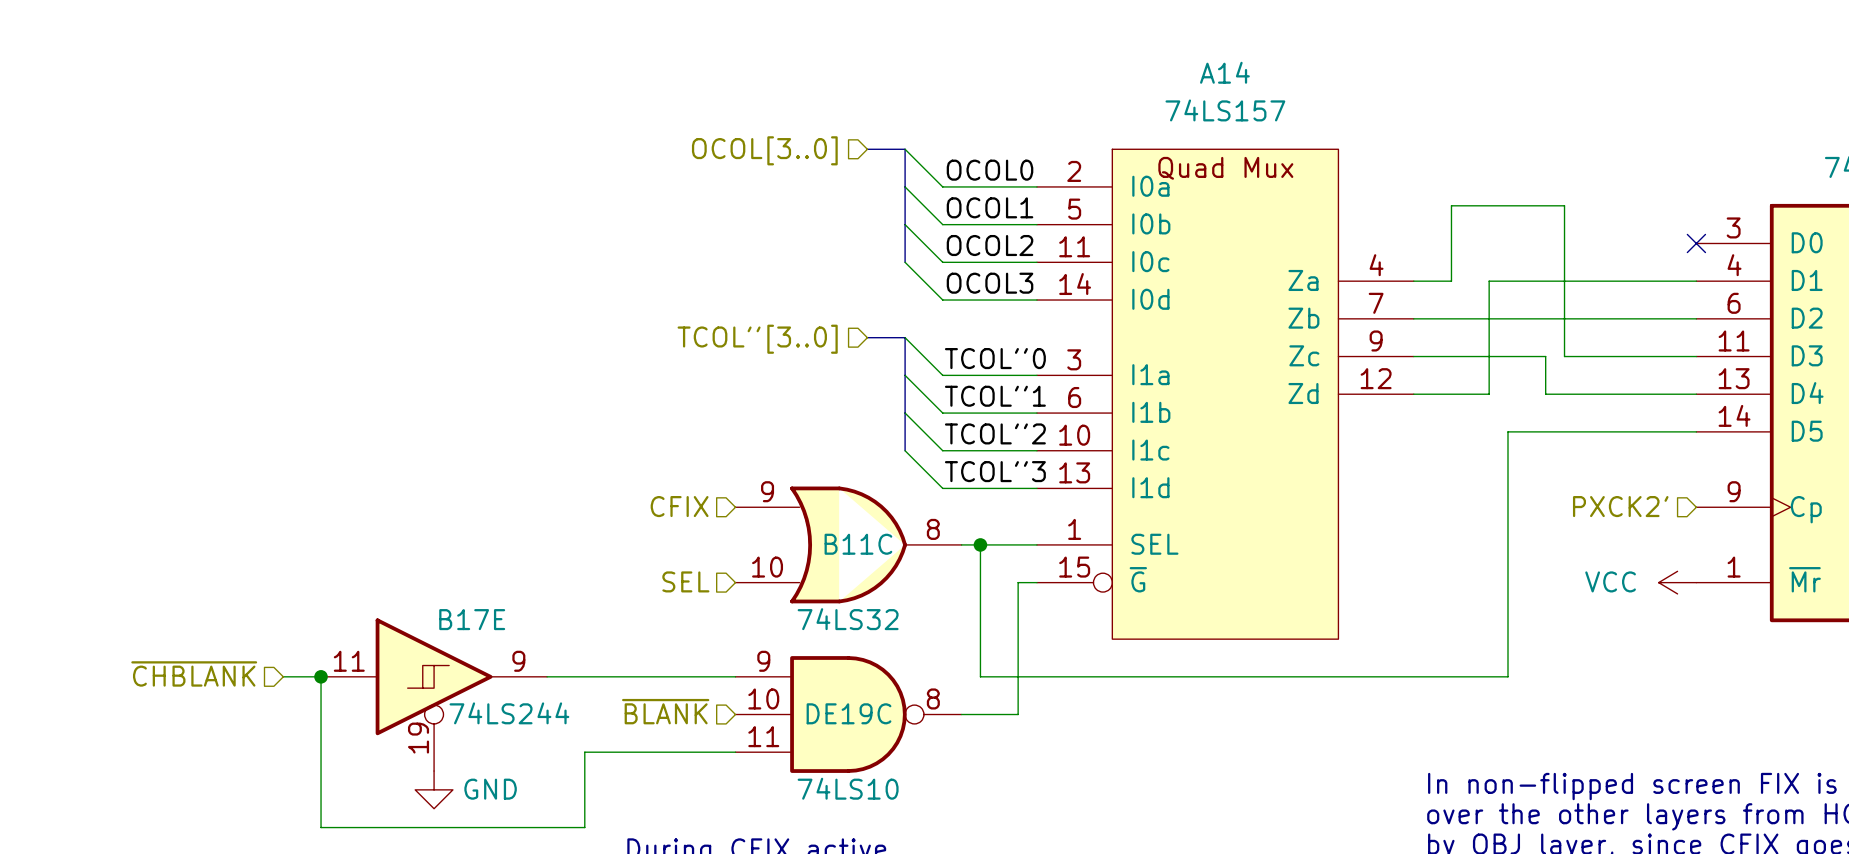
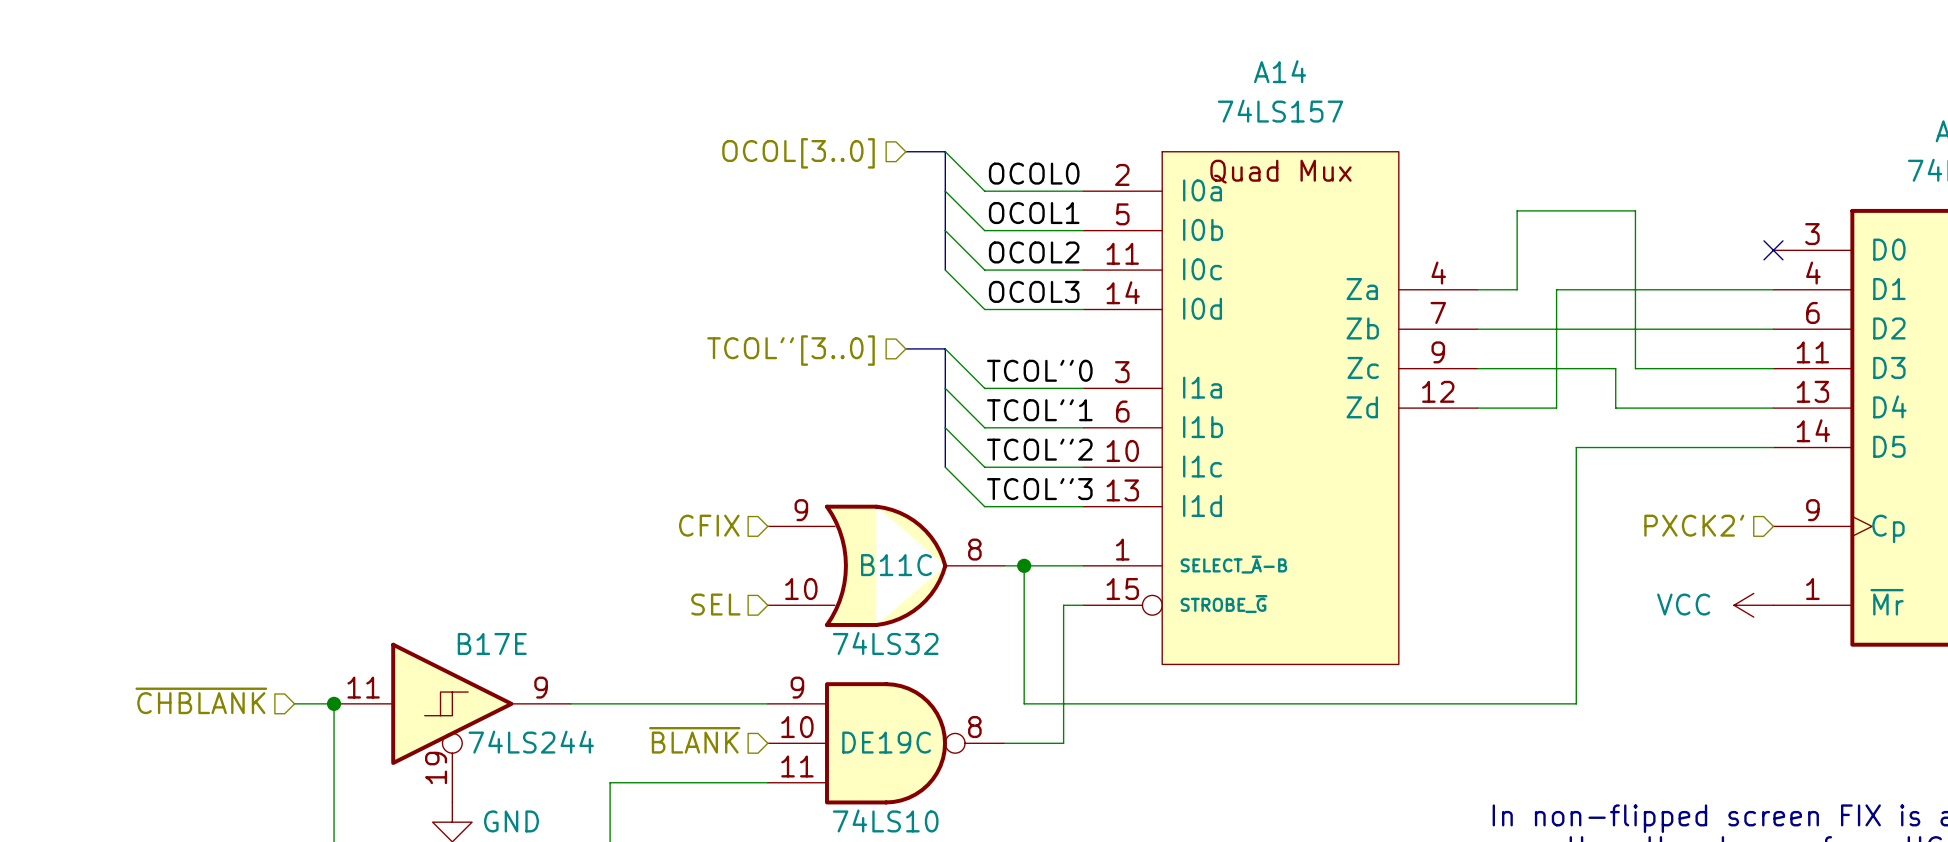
A14 pin name: SEL (1154, 544) -> SELECT_~{A}-B (1233, 564)
A14 pin name: ~{G} (1138, 579) -> STROBE_~{G} (1224, 604)

